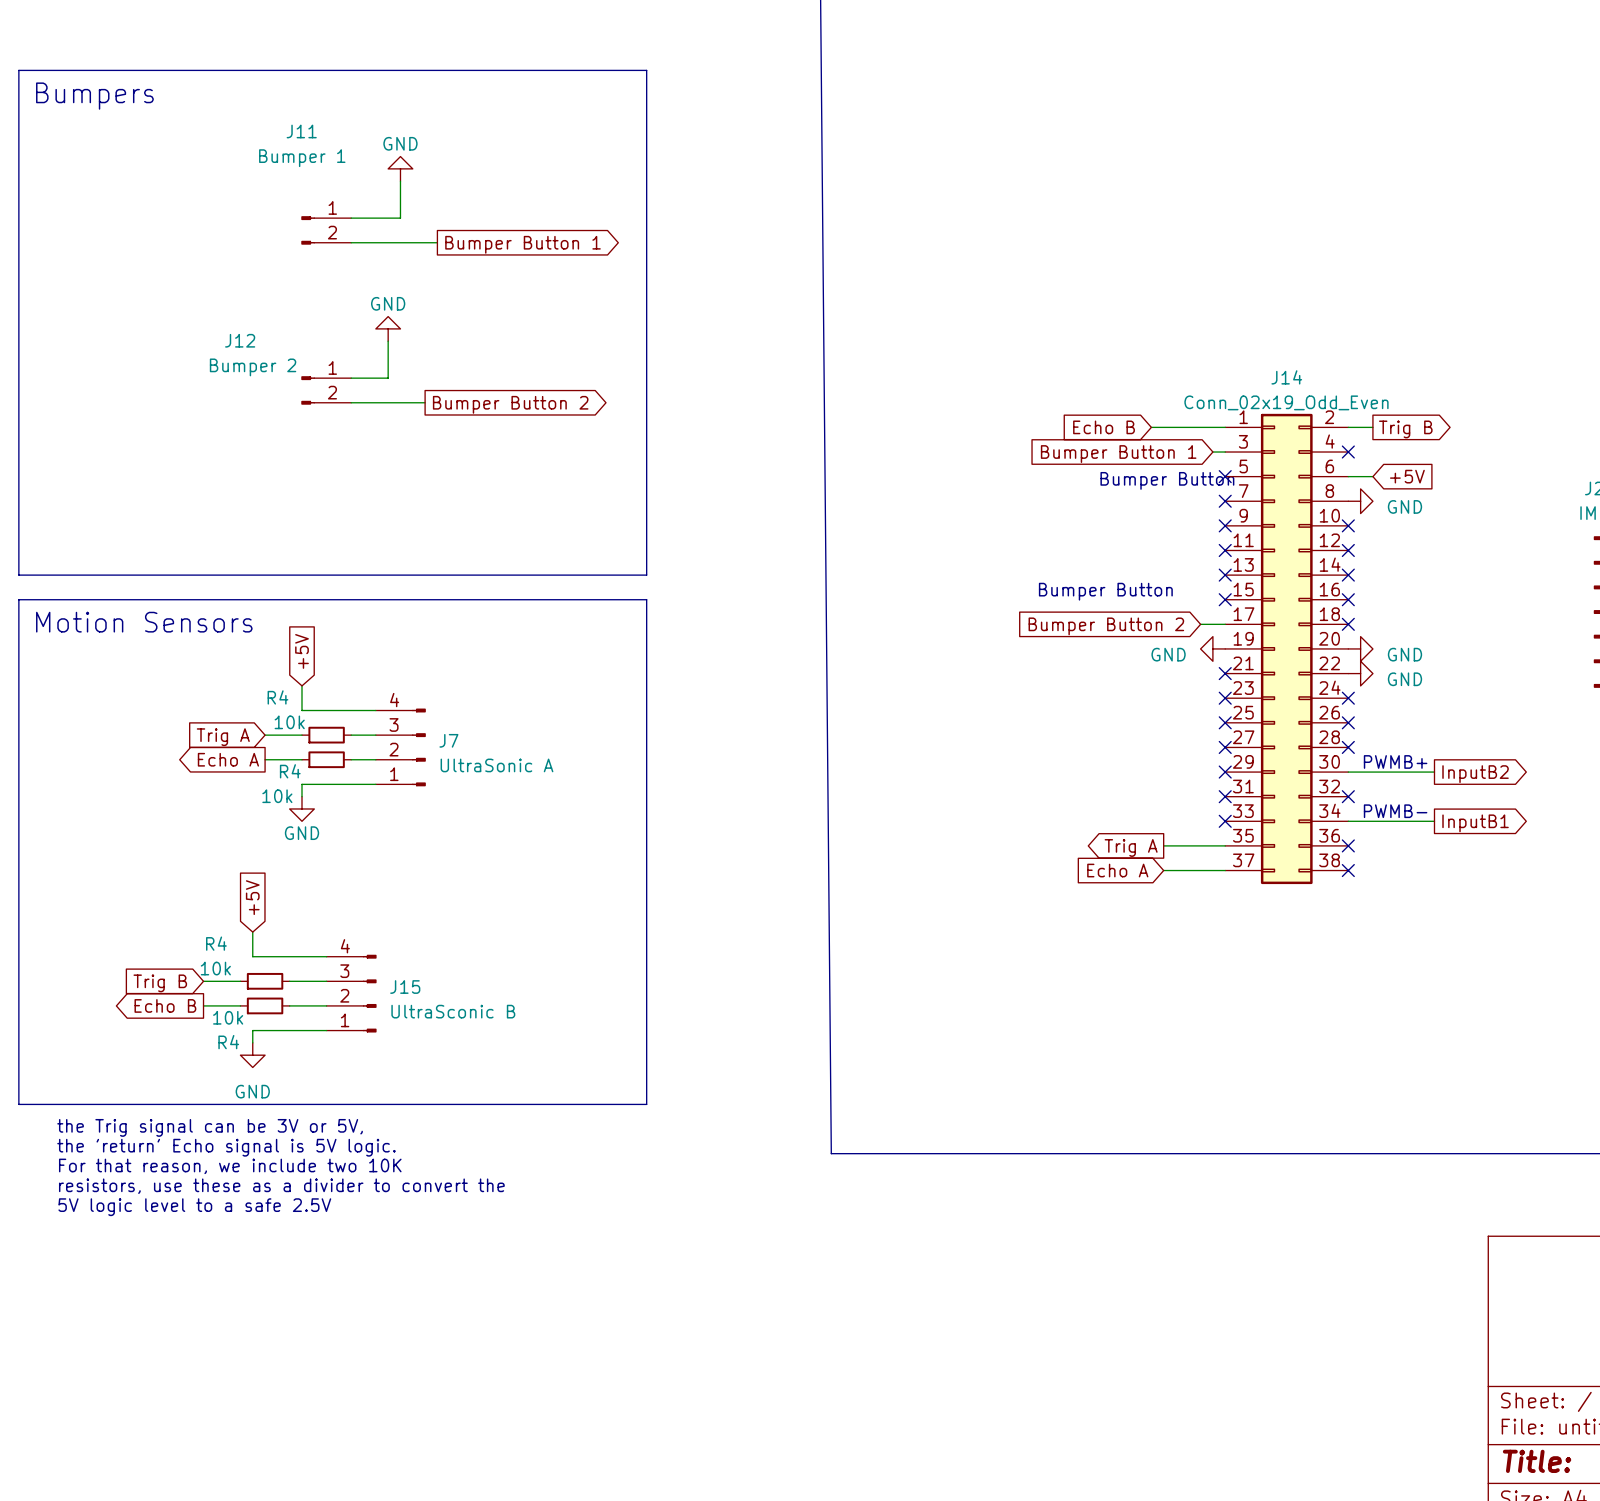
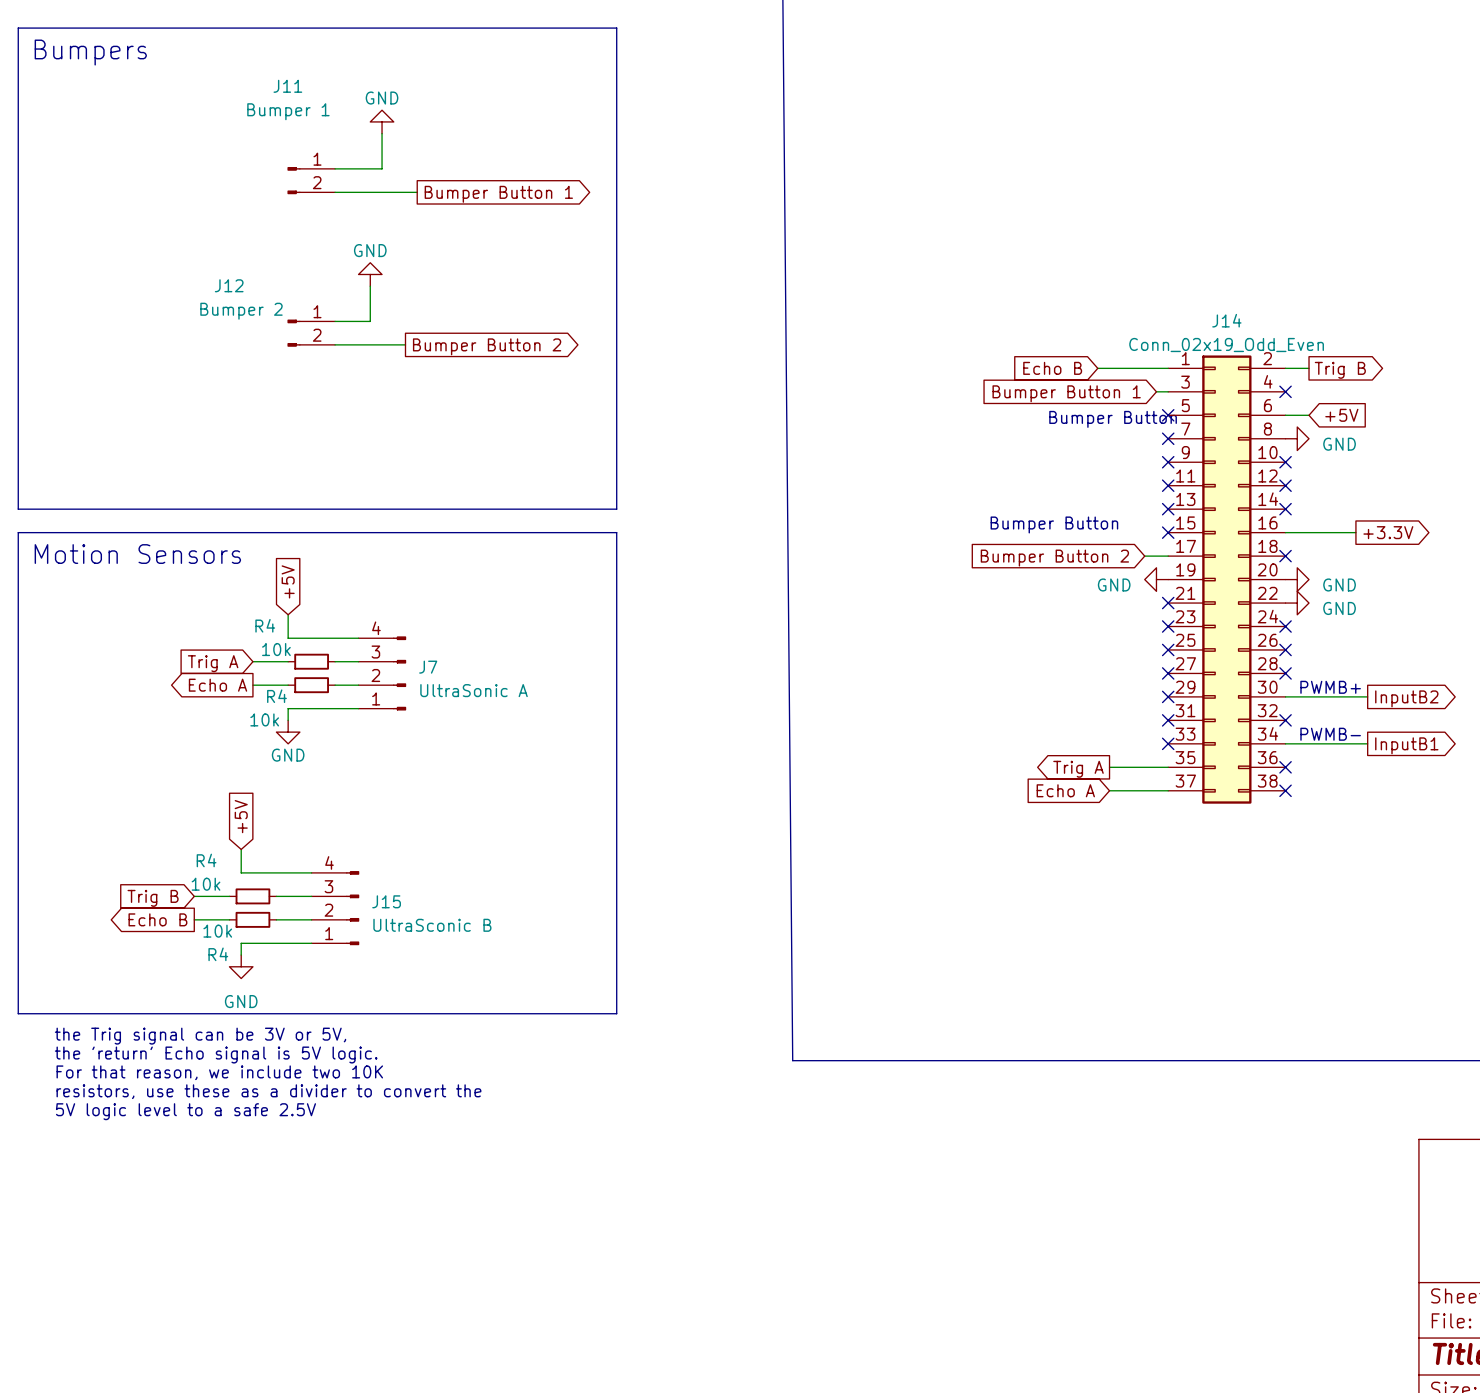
wire: none -> (1285, 532) (1355, 532)
no-connect mark: (1348, 599) -> none
global label: none -> +3.3V (1388, 532)

